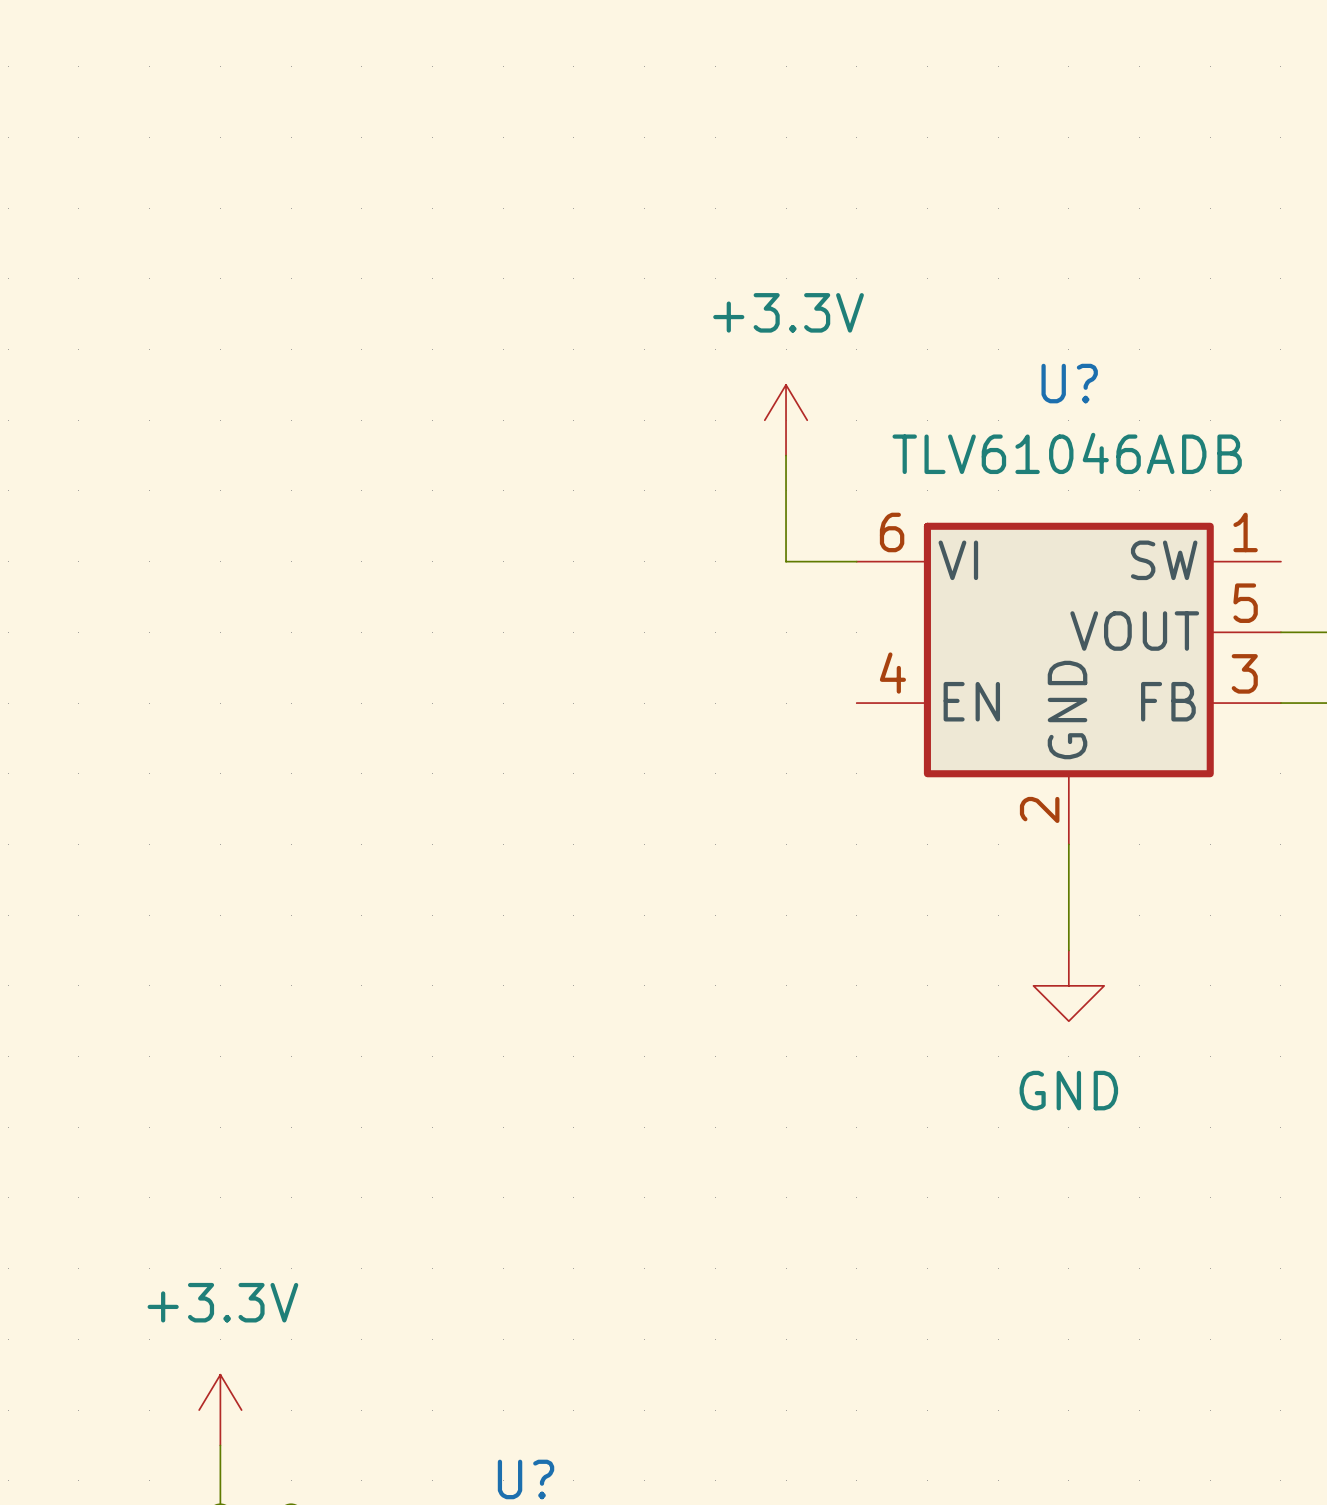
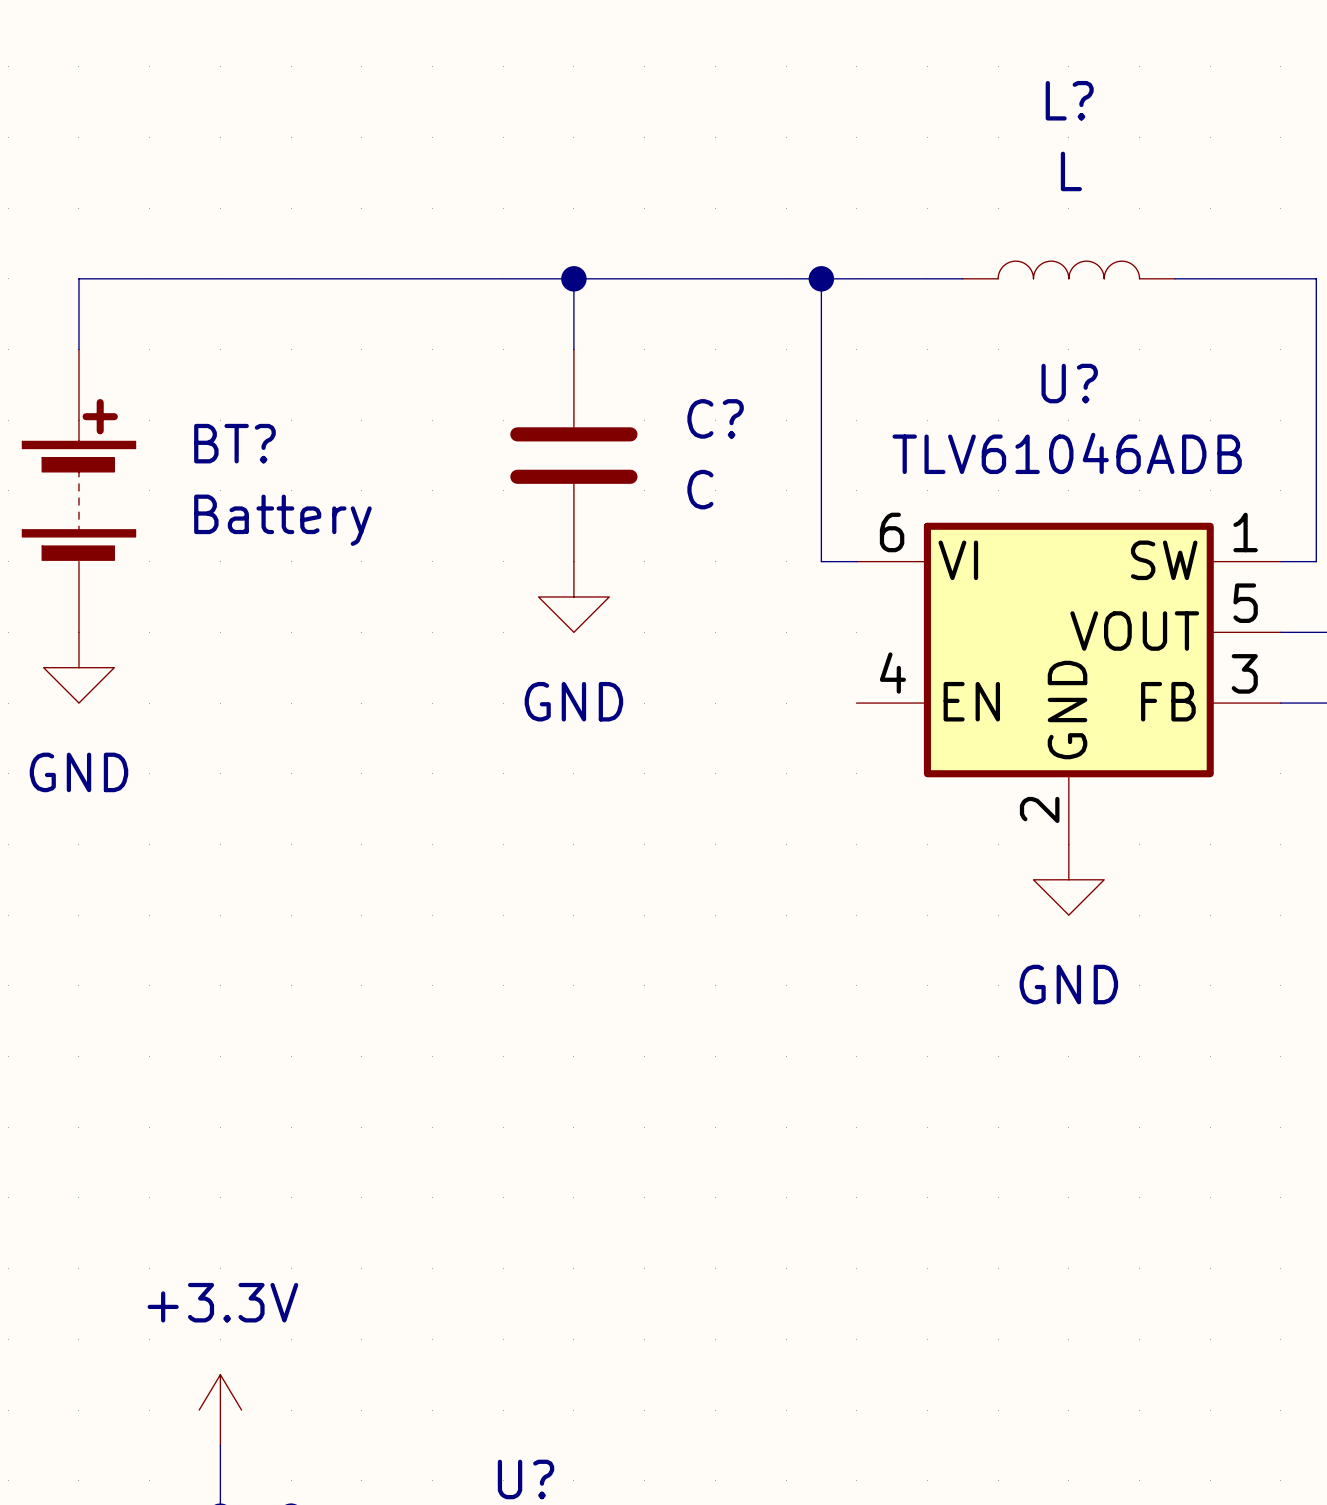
L?: none -> L (1068, 269)
wire: none -> (573, 278) (573, 349)
junction: none -> (573, 278)
junction: none -> (821, 278)
wire: none -> (962, 278) (78, 278) (78, 349)
wire: none -> (1174, 278) (1316, 278) (1316, 561) (1280, 561)
power symbol: +3.3V (786, 420) -> none
C?: none -> C (573, 455)
wire: (786, 455) (786, 561) (821, 561) -> (821, 278) (821, 561)
BT?: none -> Battery (78, 490)
power symbol: none -> GND (573, 596)
power symbol: none -> GND (78, 667)
wire: (1068, 844) (1068, 950) -> none
power symbol position: GND (1068, 985) -> GND (1068, 879)

